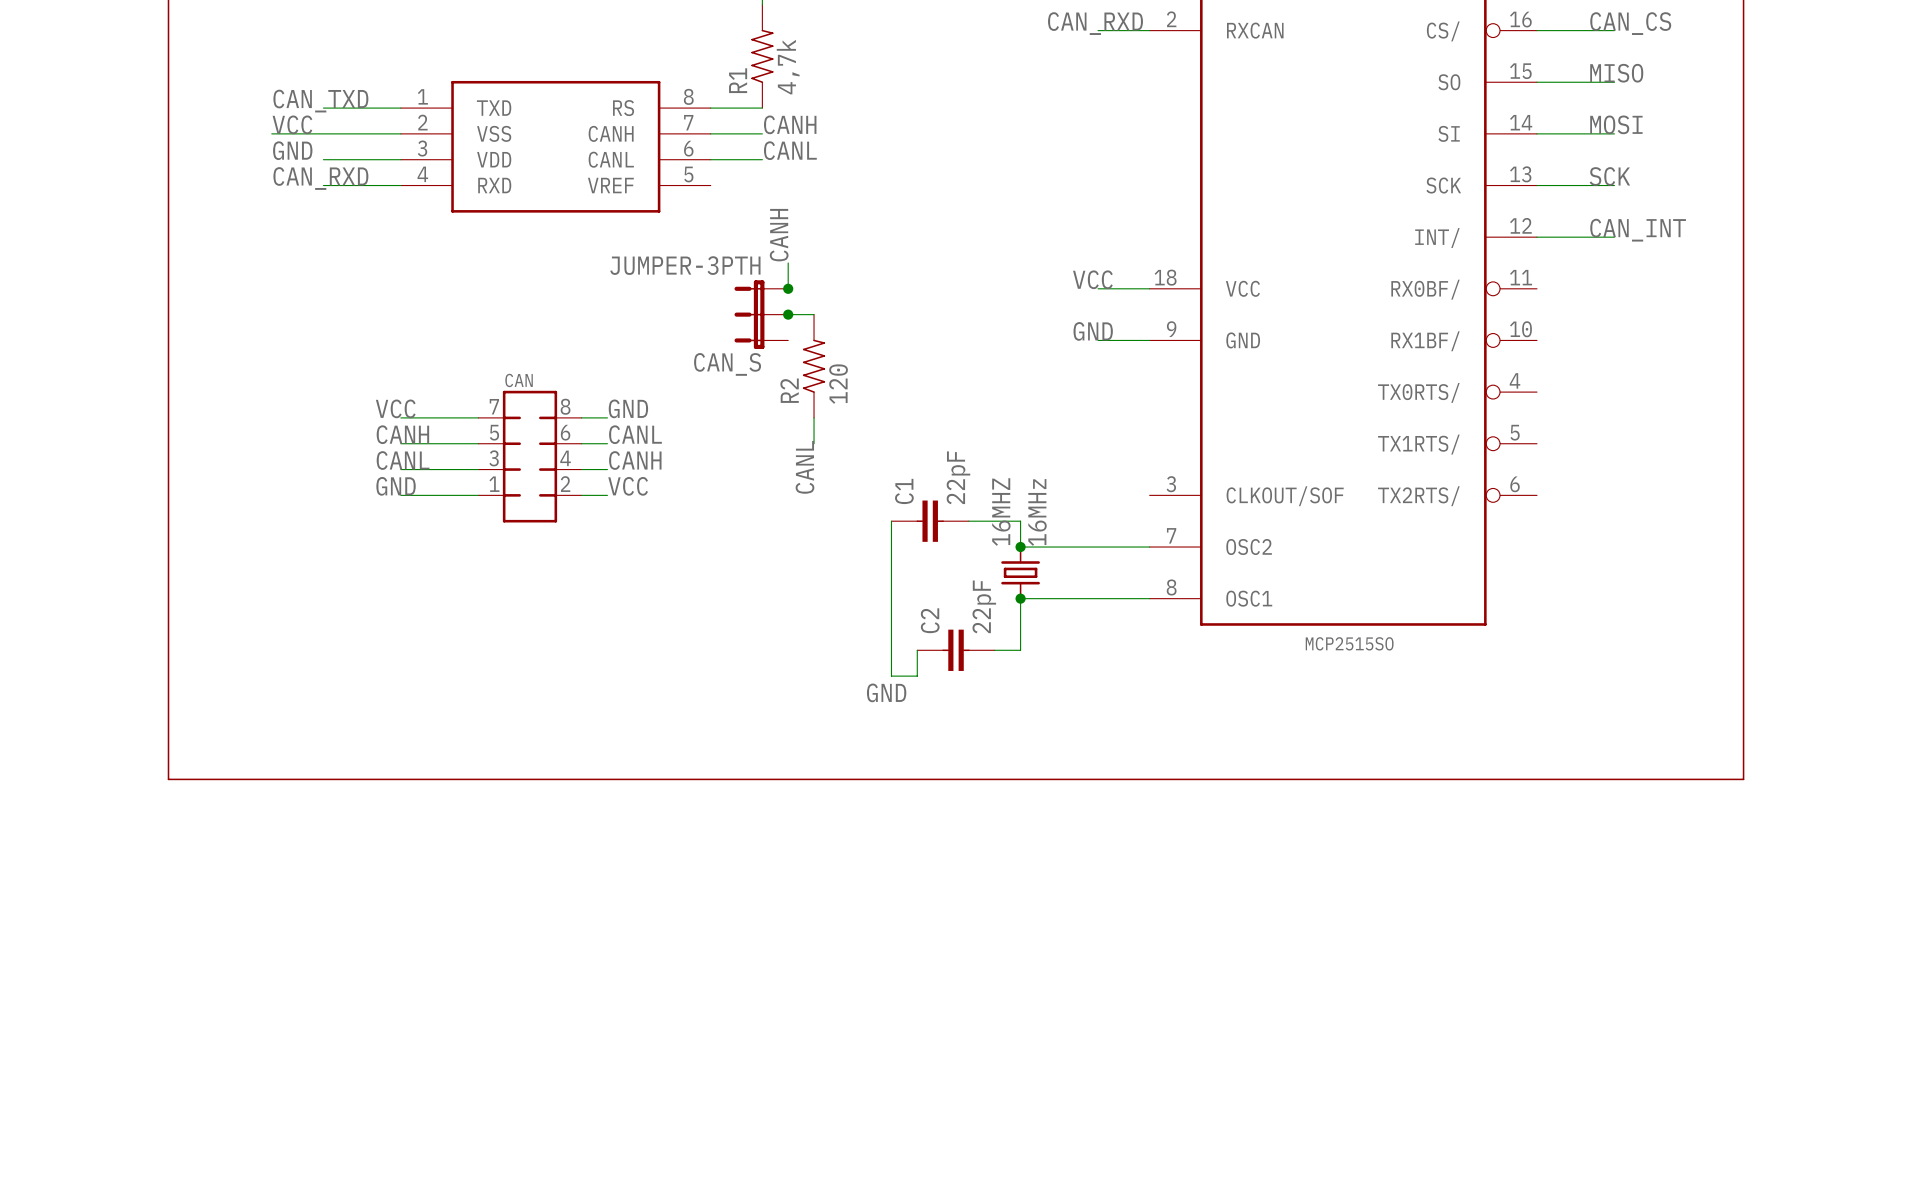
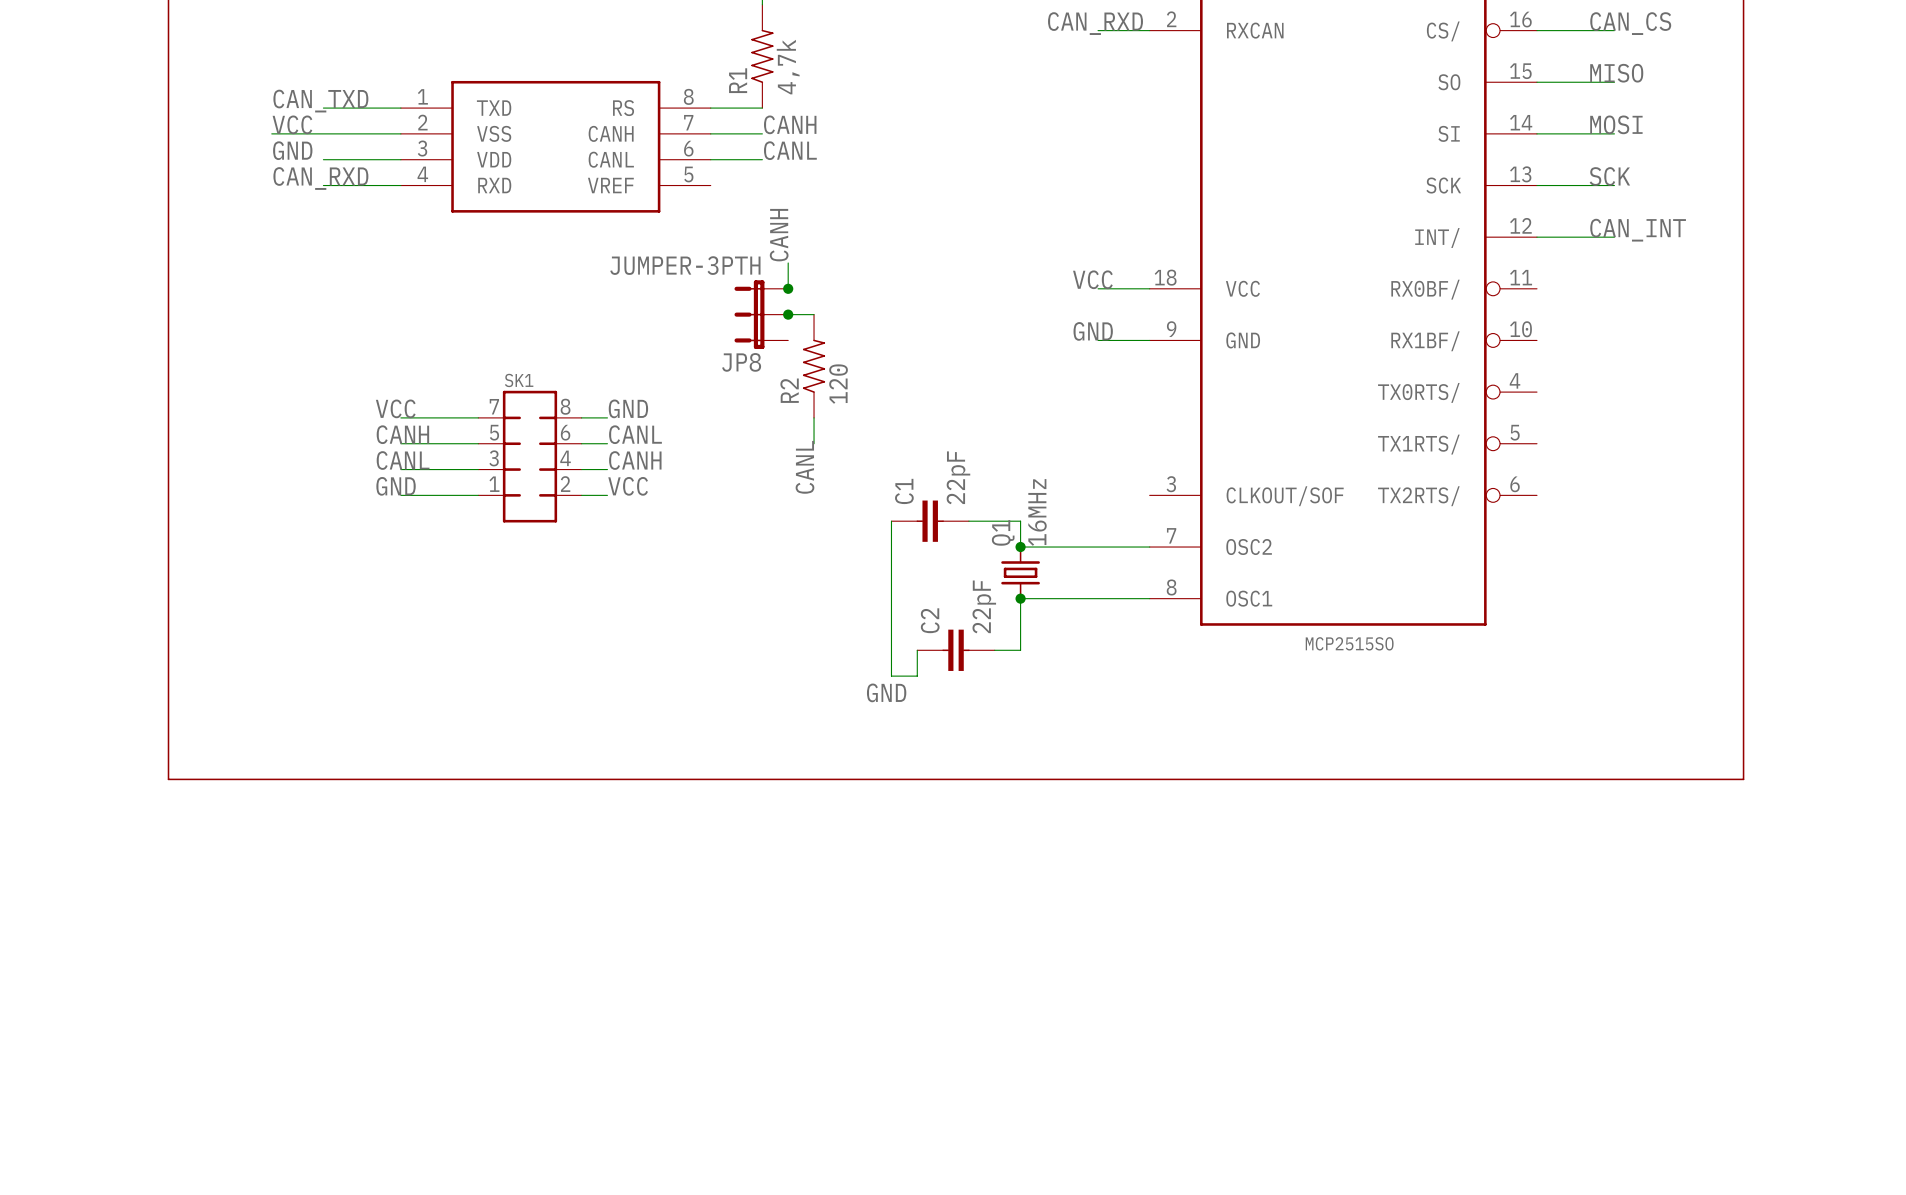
CAN_S name: CAN_S (727, 364) -> JP8 (741, 362)
CAN name: CAN (519, 380) -> SK1 (519, 380)
16MHZ name: 16MHZ (1001, 512) -> Q1 (1003, 532)

